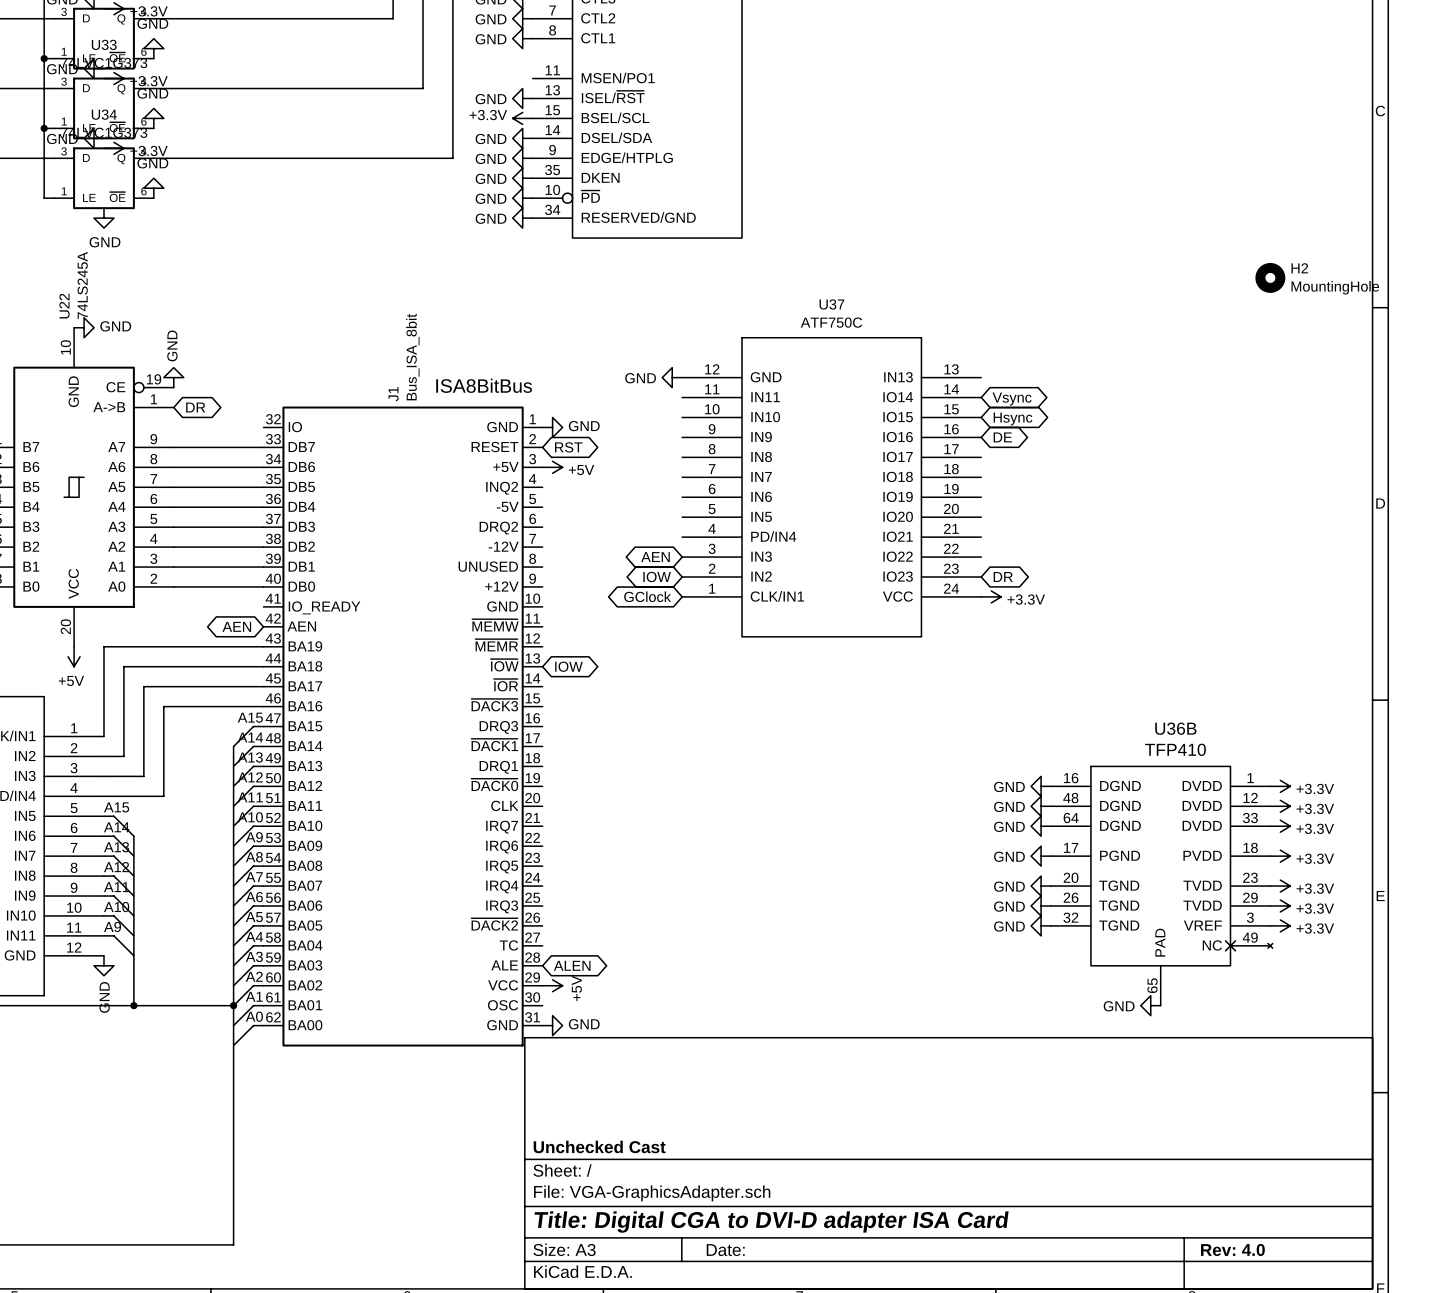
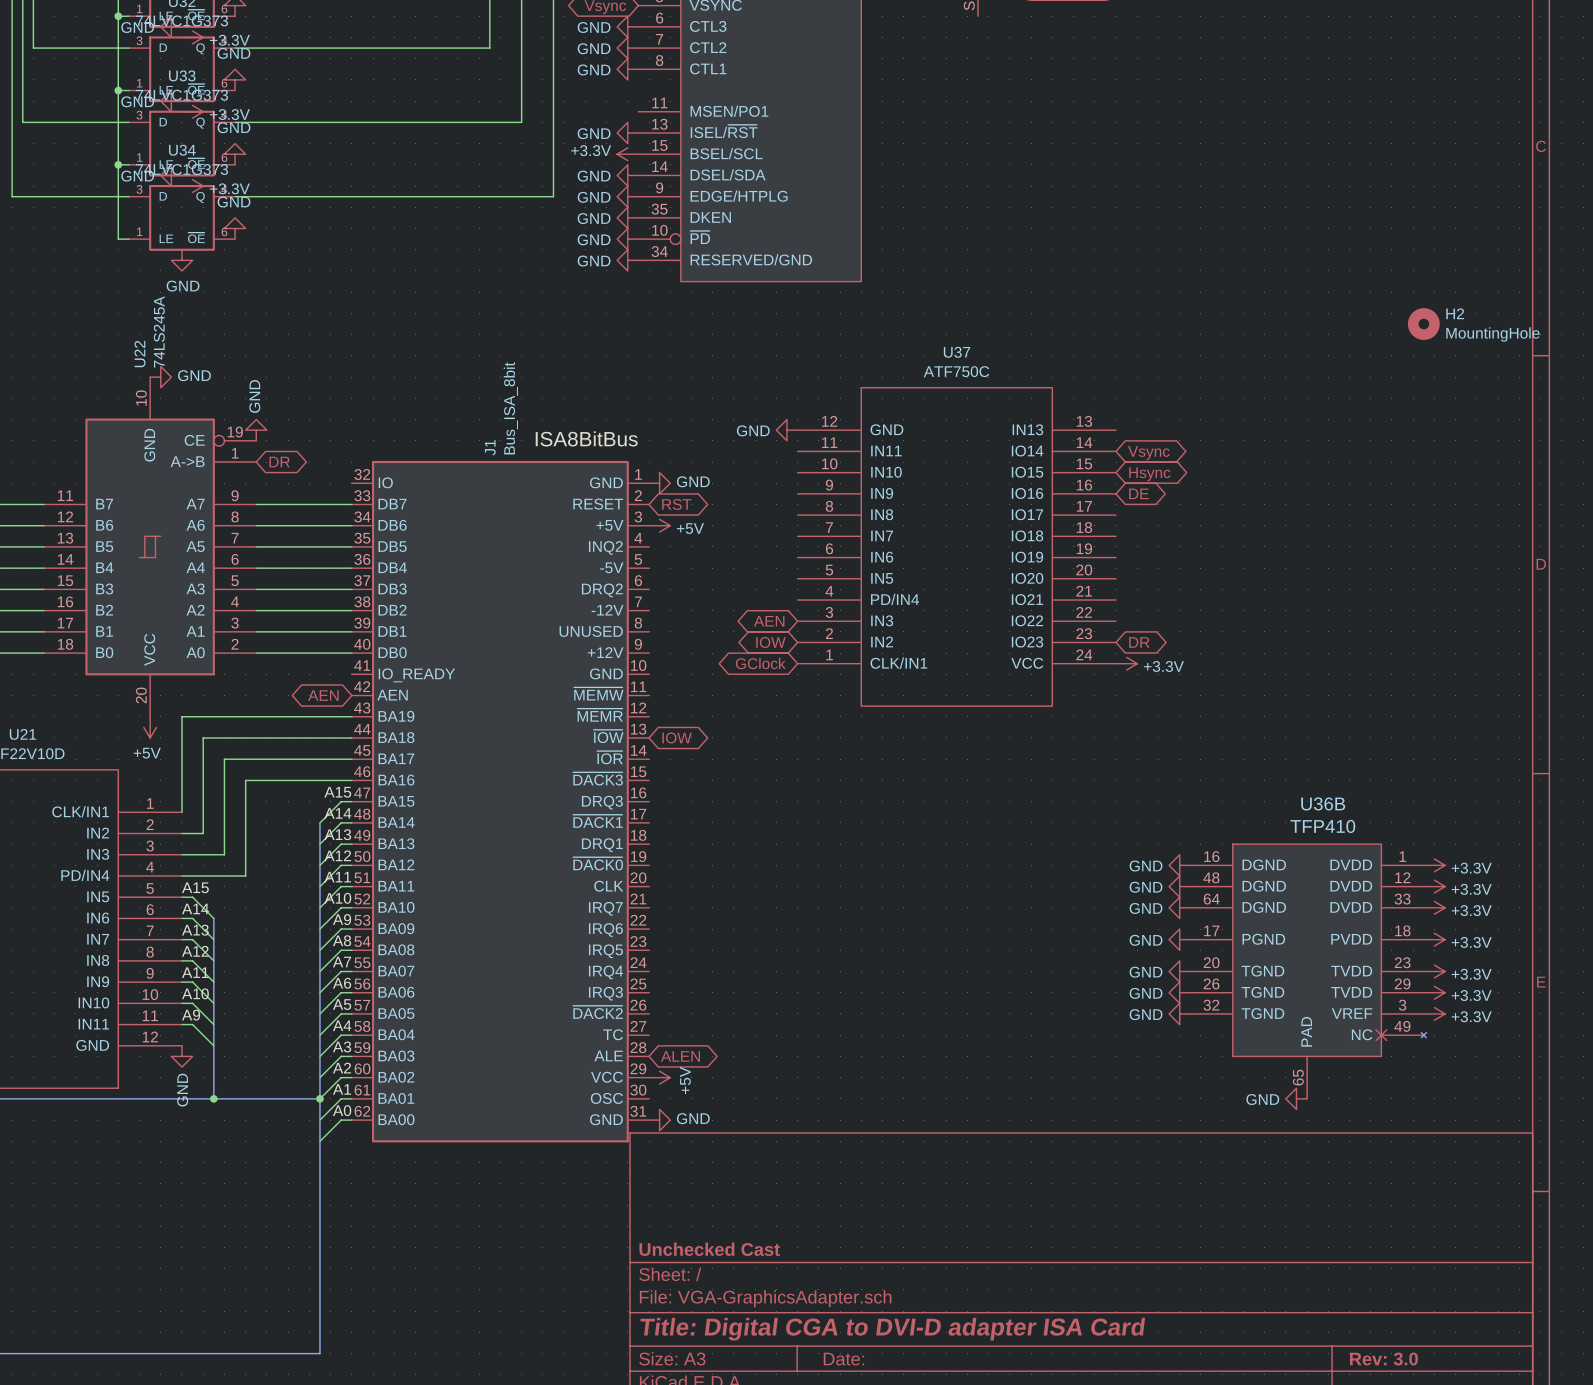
title block: Rev: 4.0 (1232, 1249) -> Rev: 3.0 (1383, 1359)

